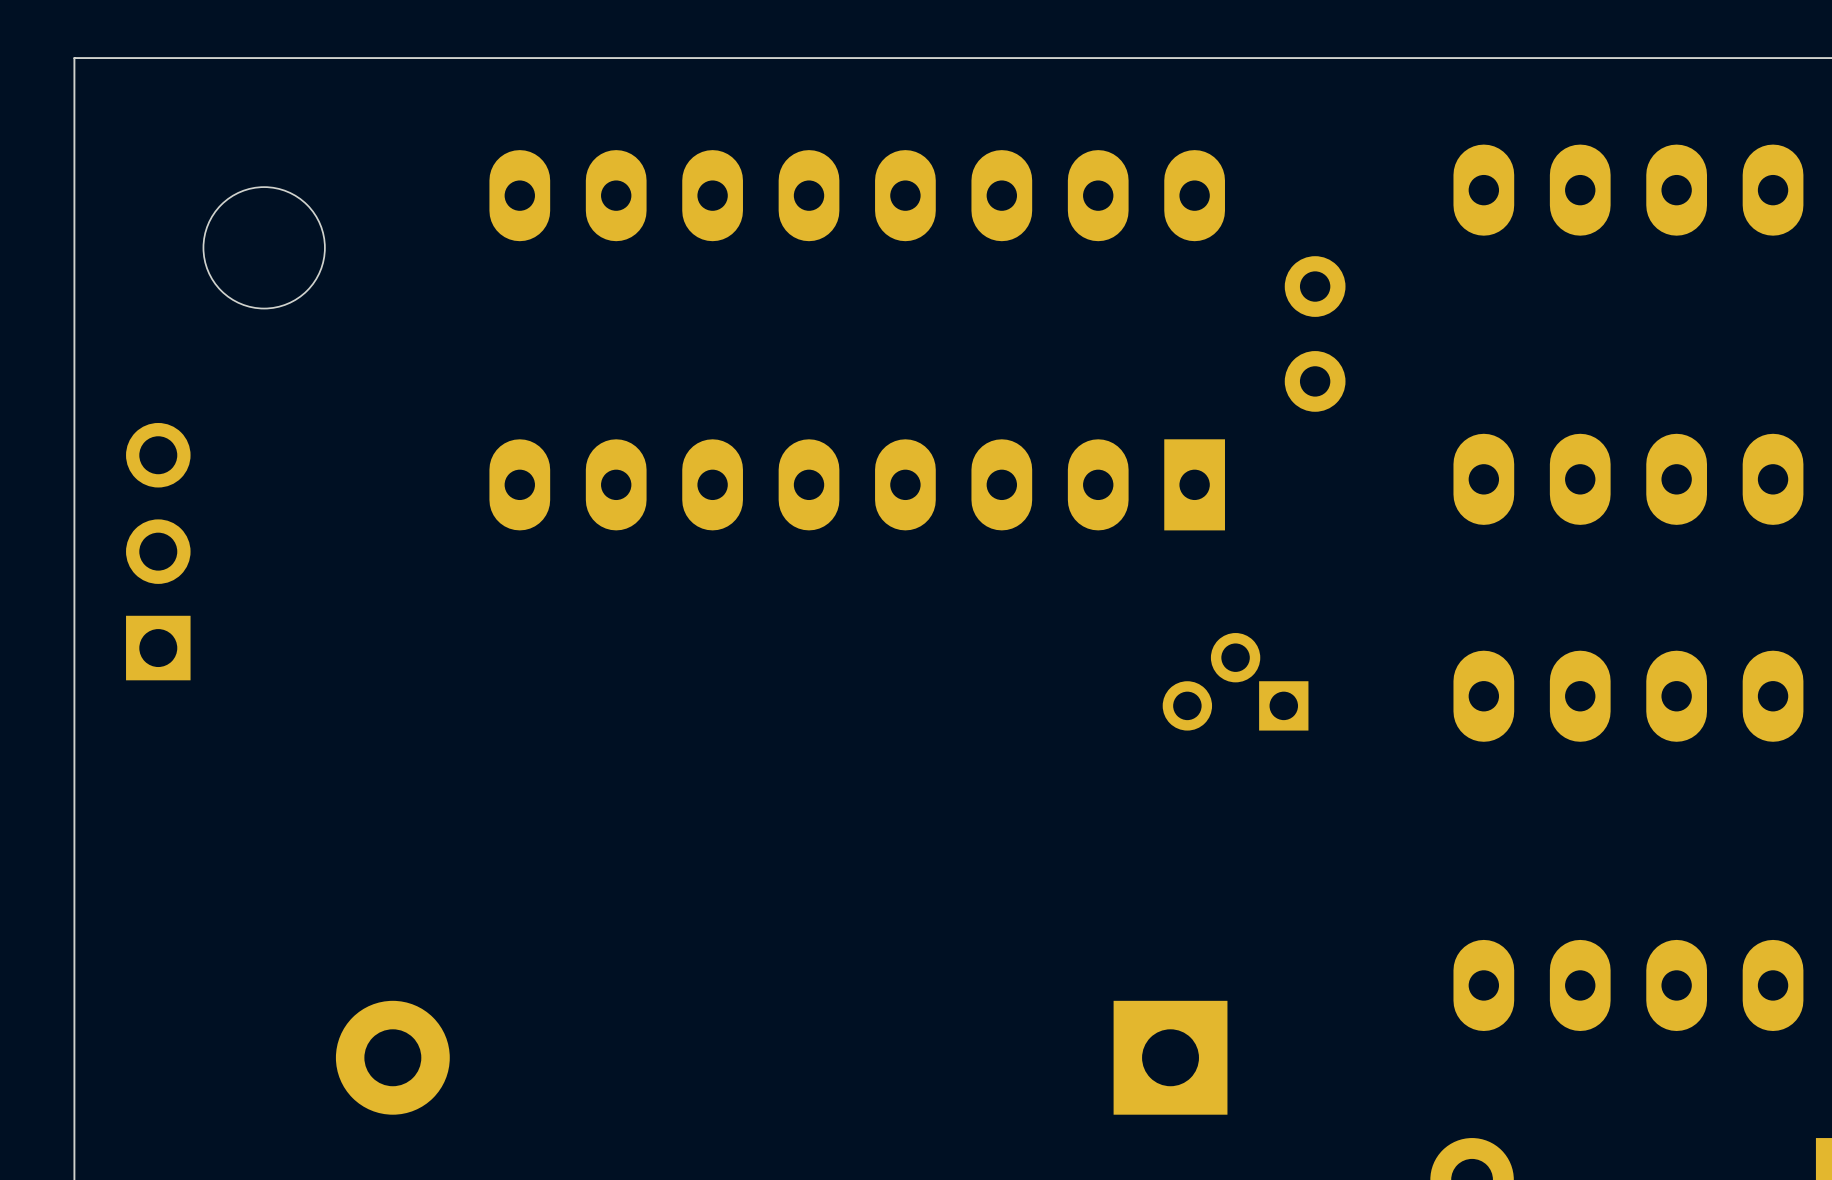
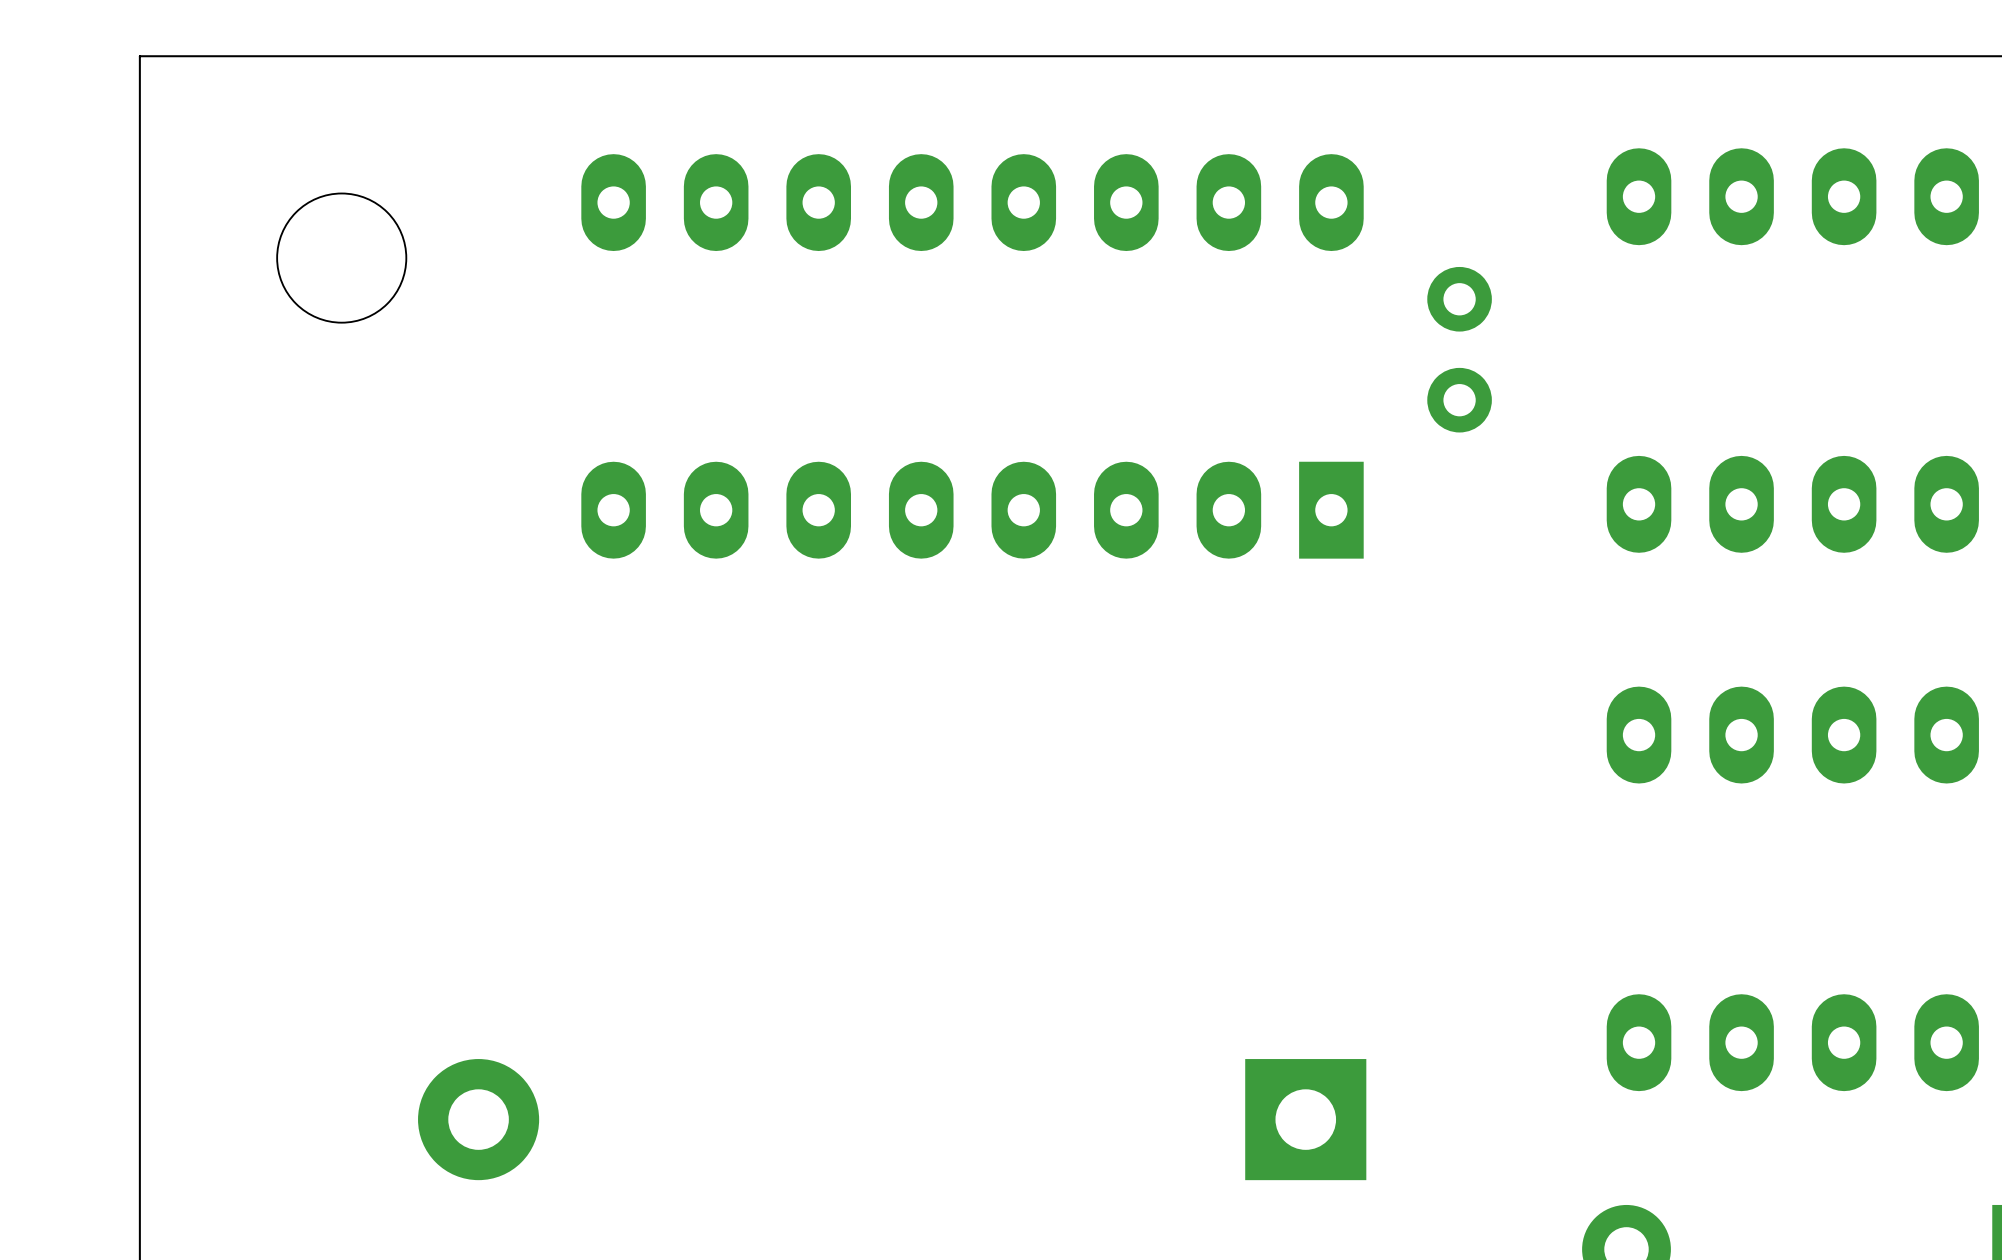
part: (158, 551) -> none
part: (1235, 681) -> none

